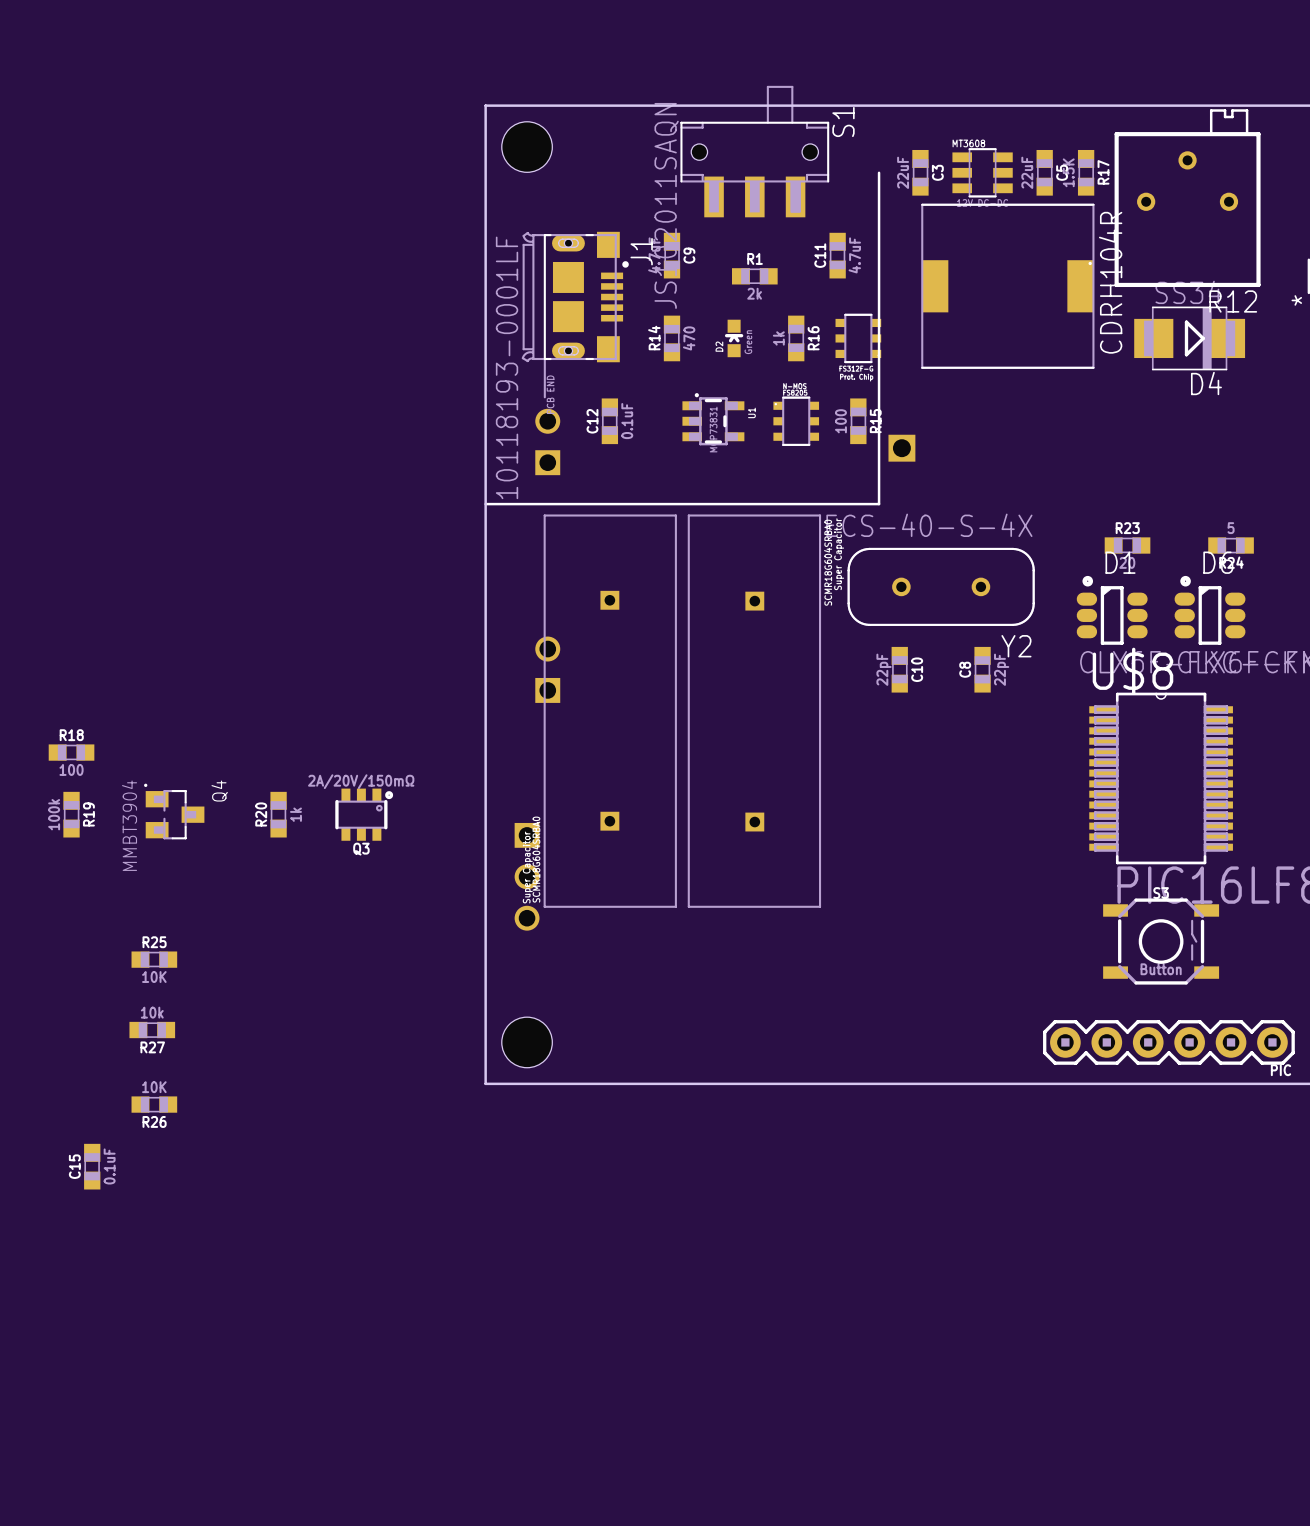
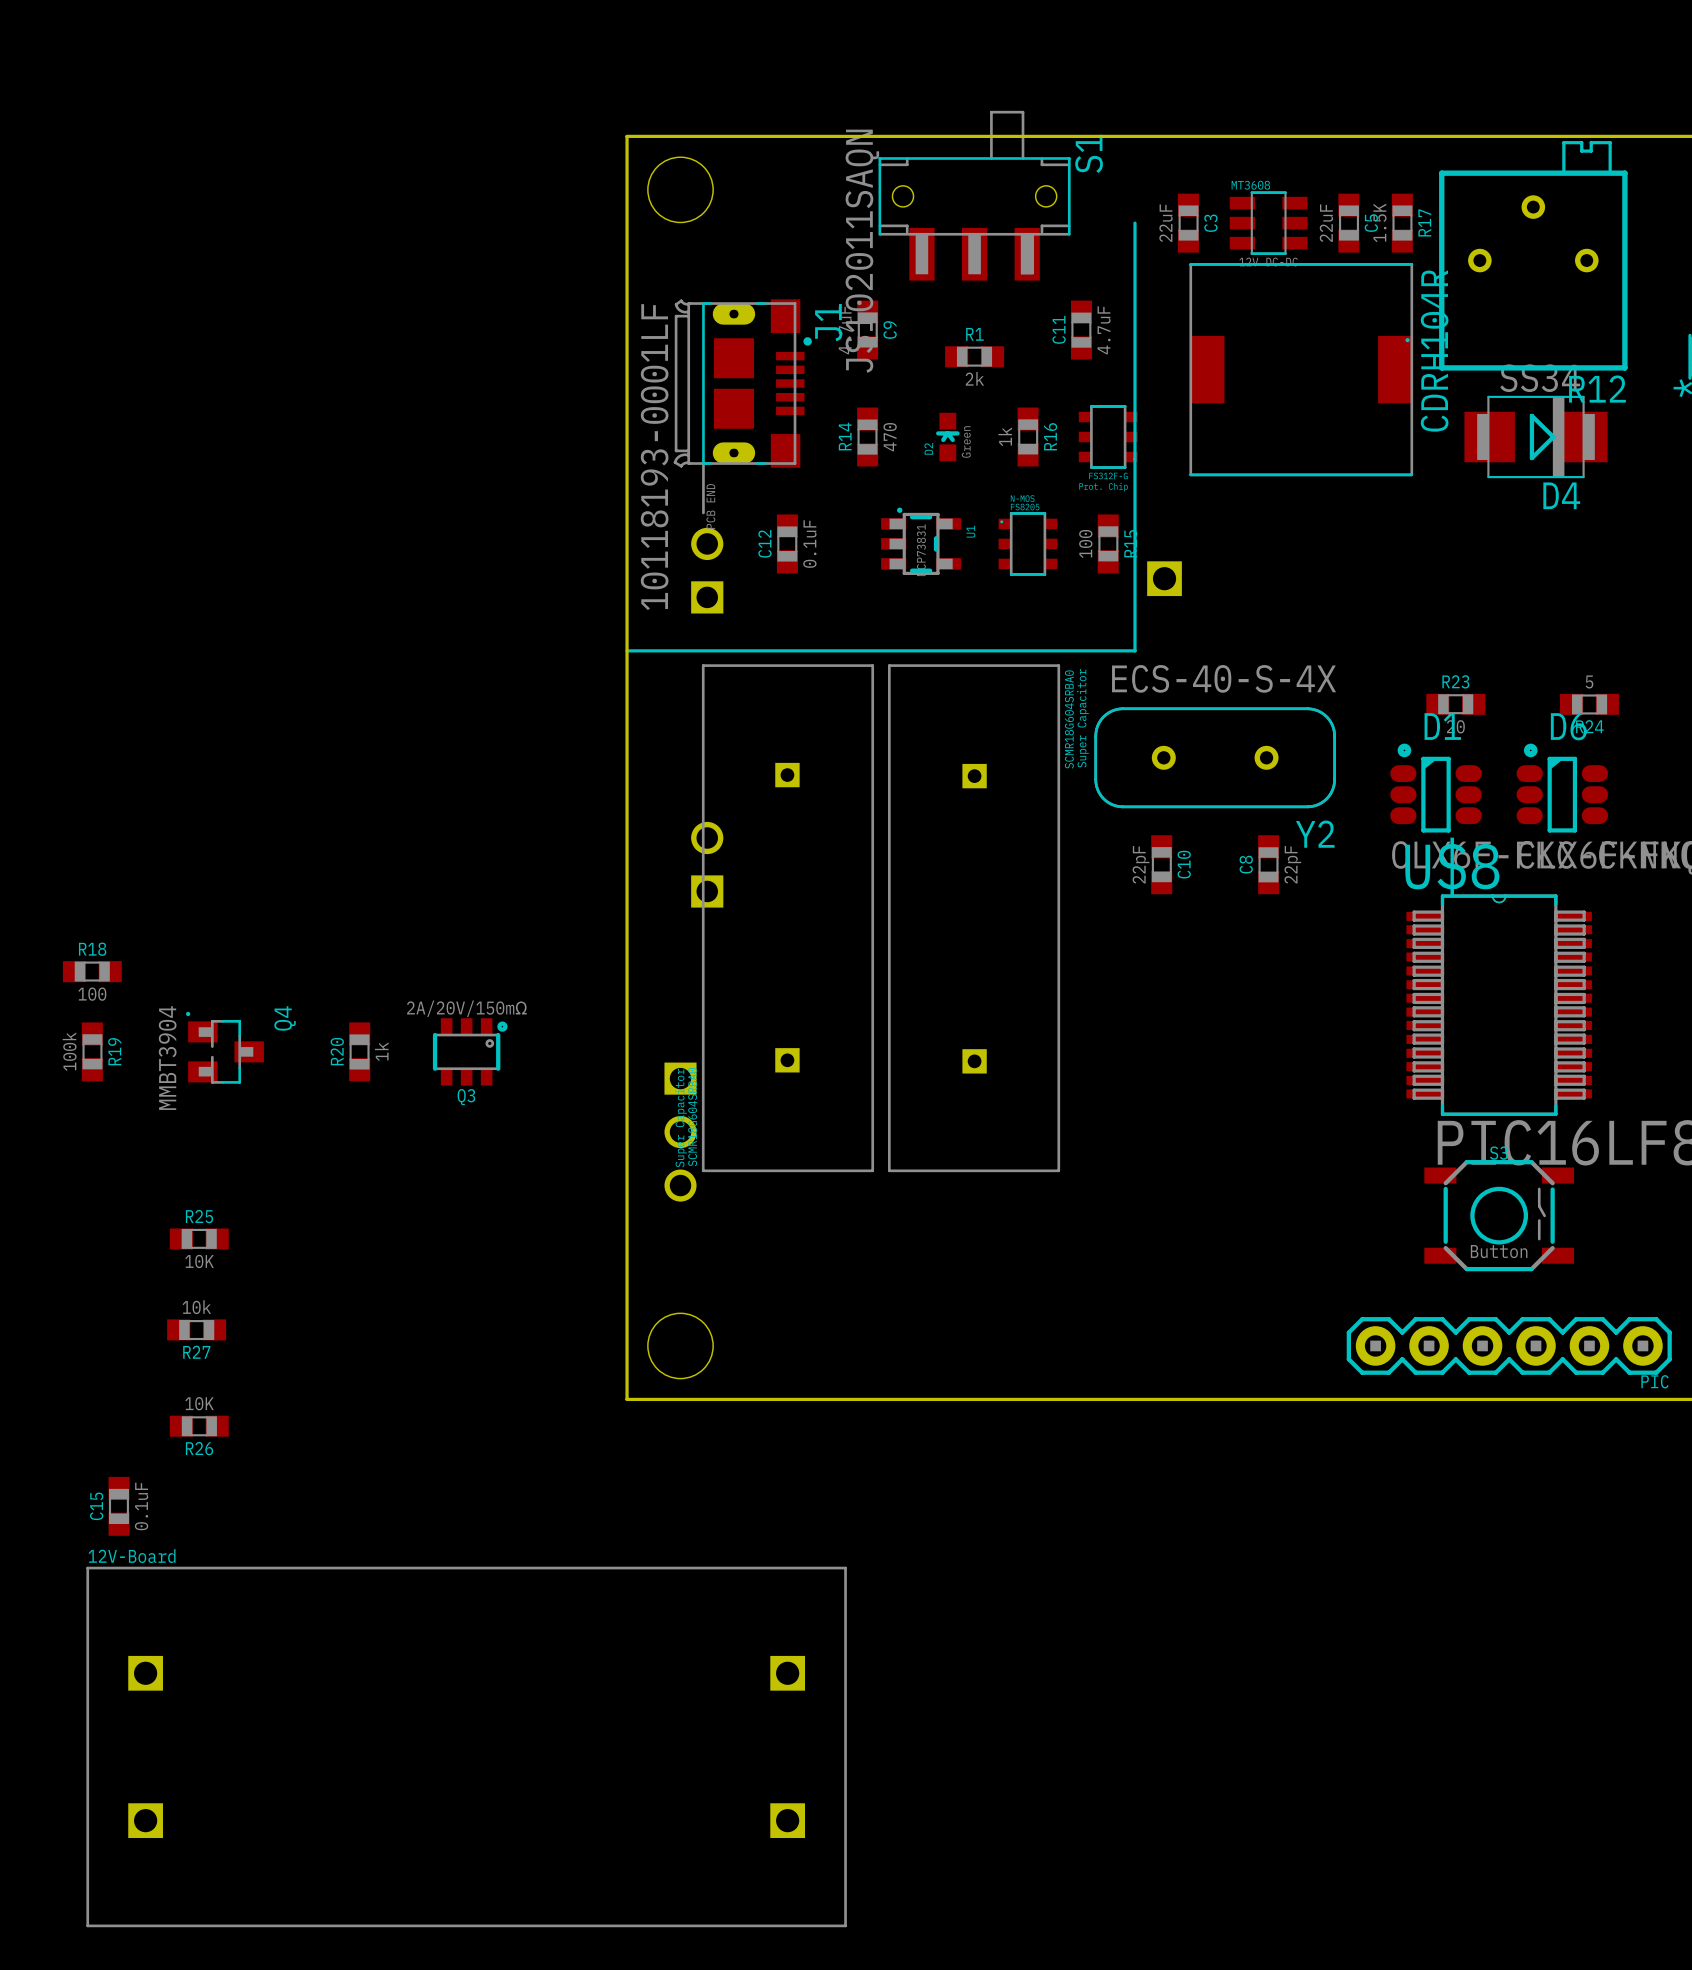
part: none -> (466, 1746)

